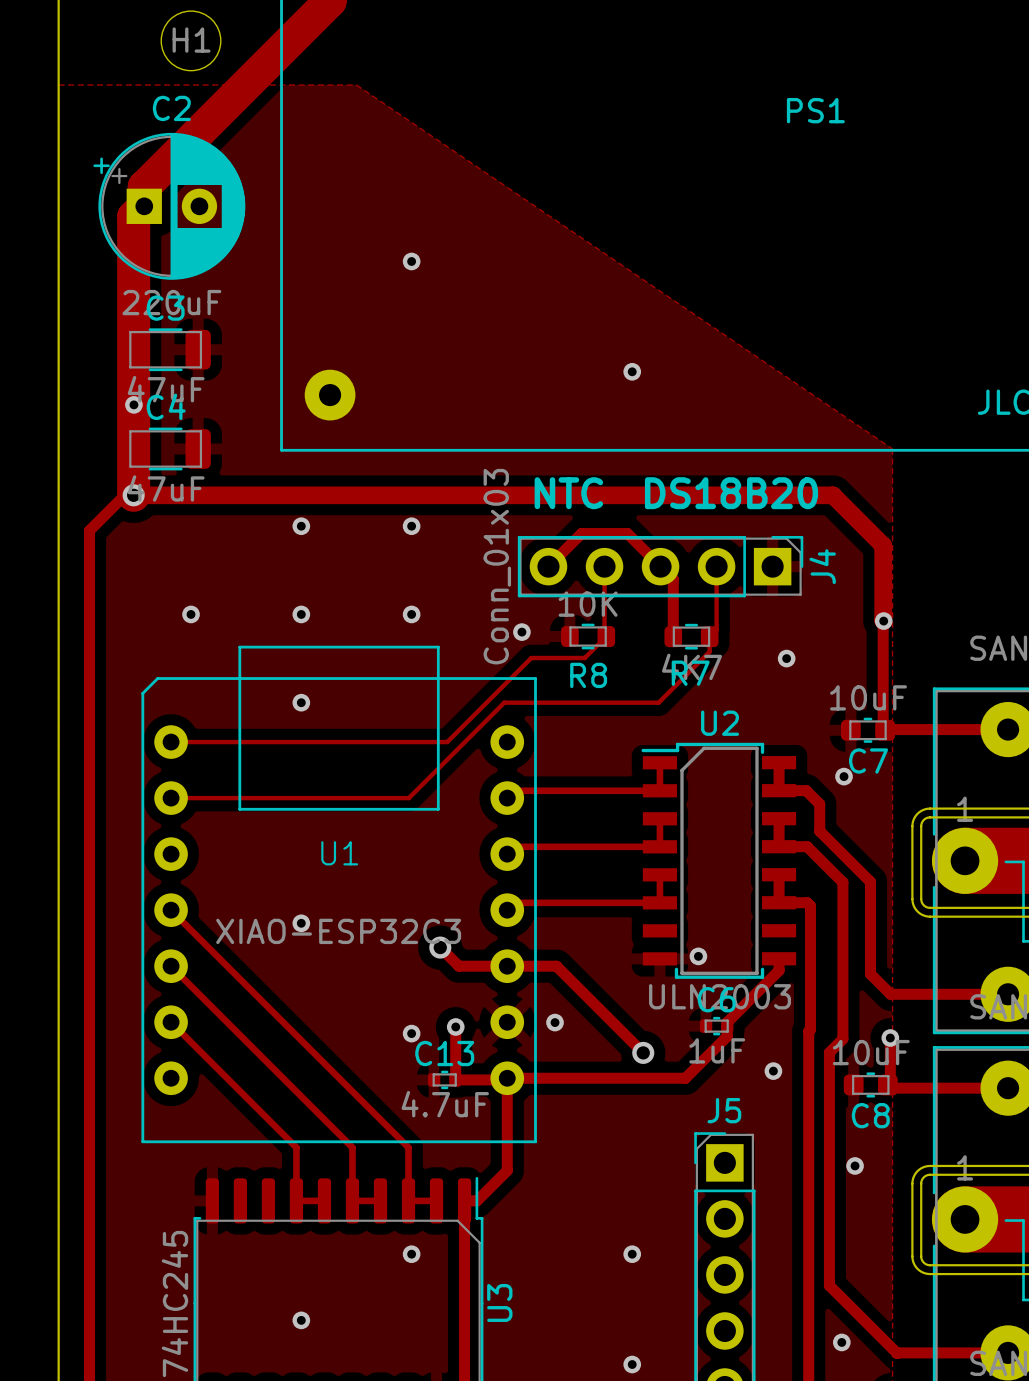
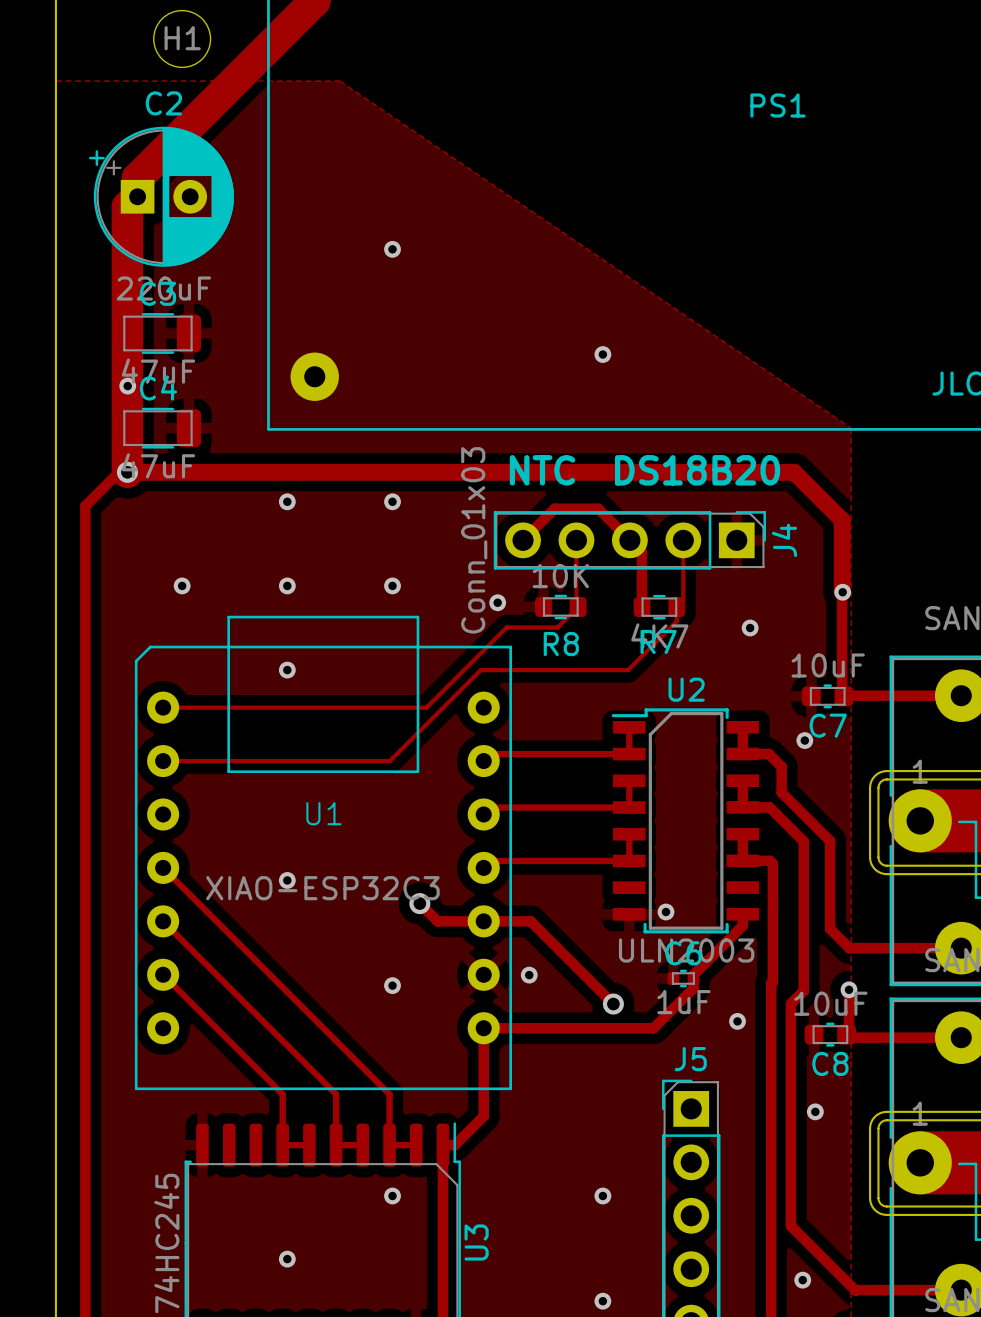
track: (455, 1026) (455, 1079) (505, 1079) (507, 1078) -> none
via: (455, 1026) -> none
C13: 4.7uF (444, 1079) -> none

